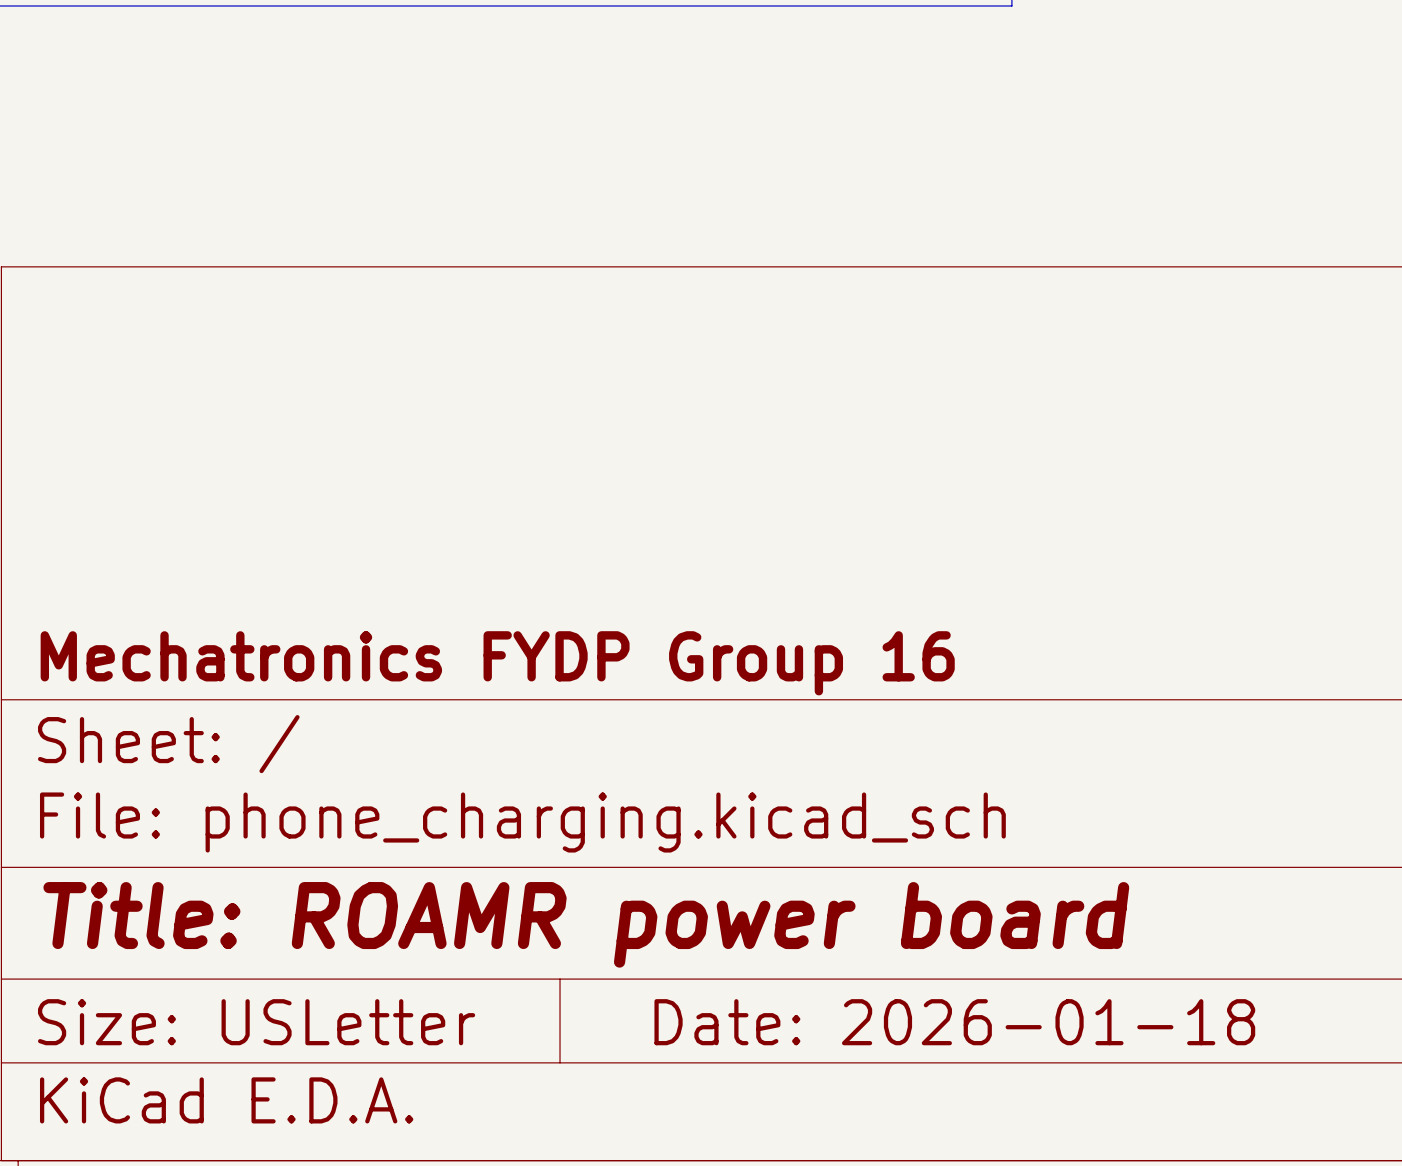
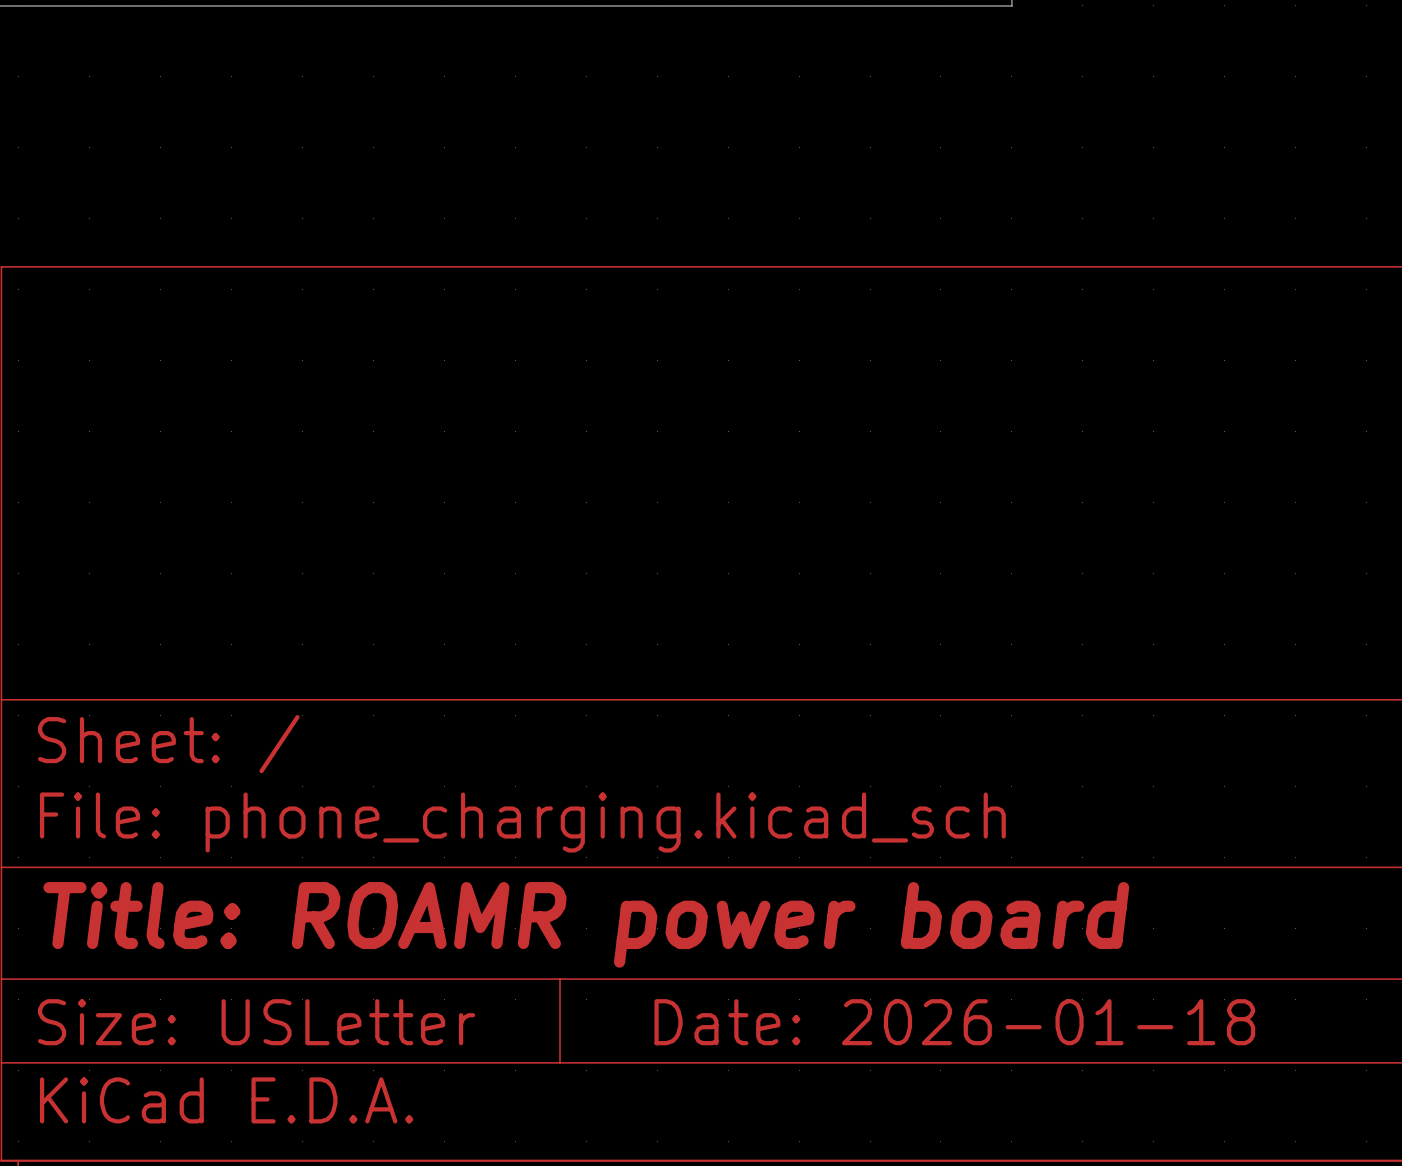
title block: Mechatronics FYDP Group 16 (497, 663) -> none

